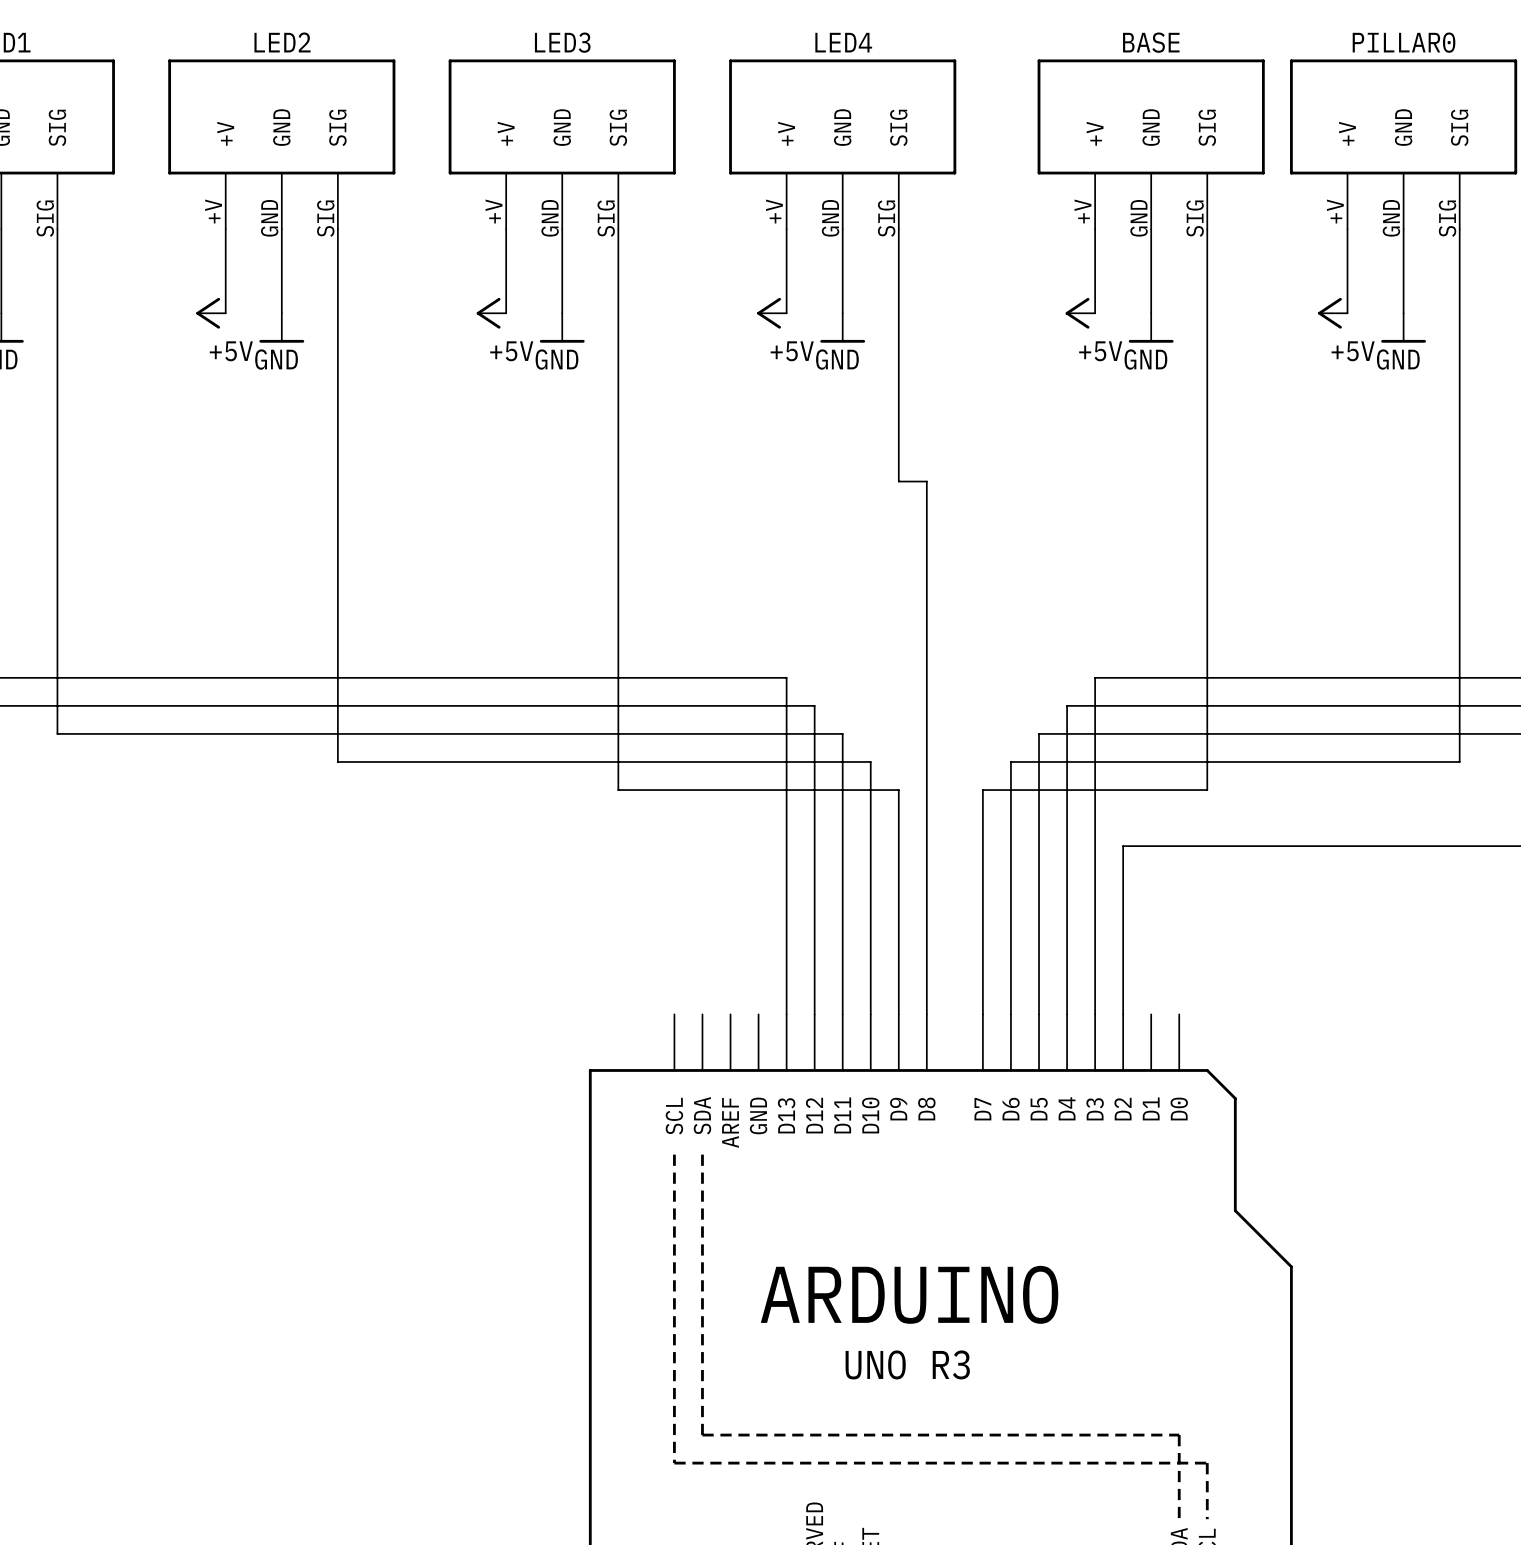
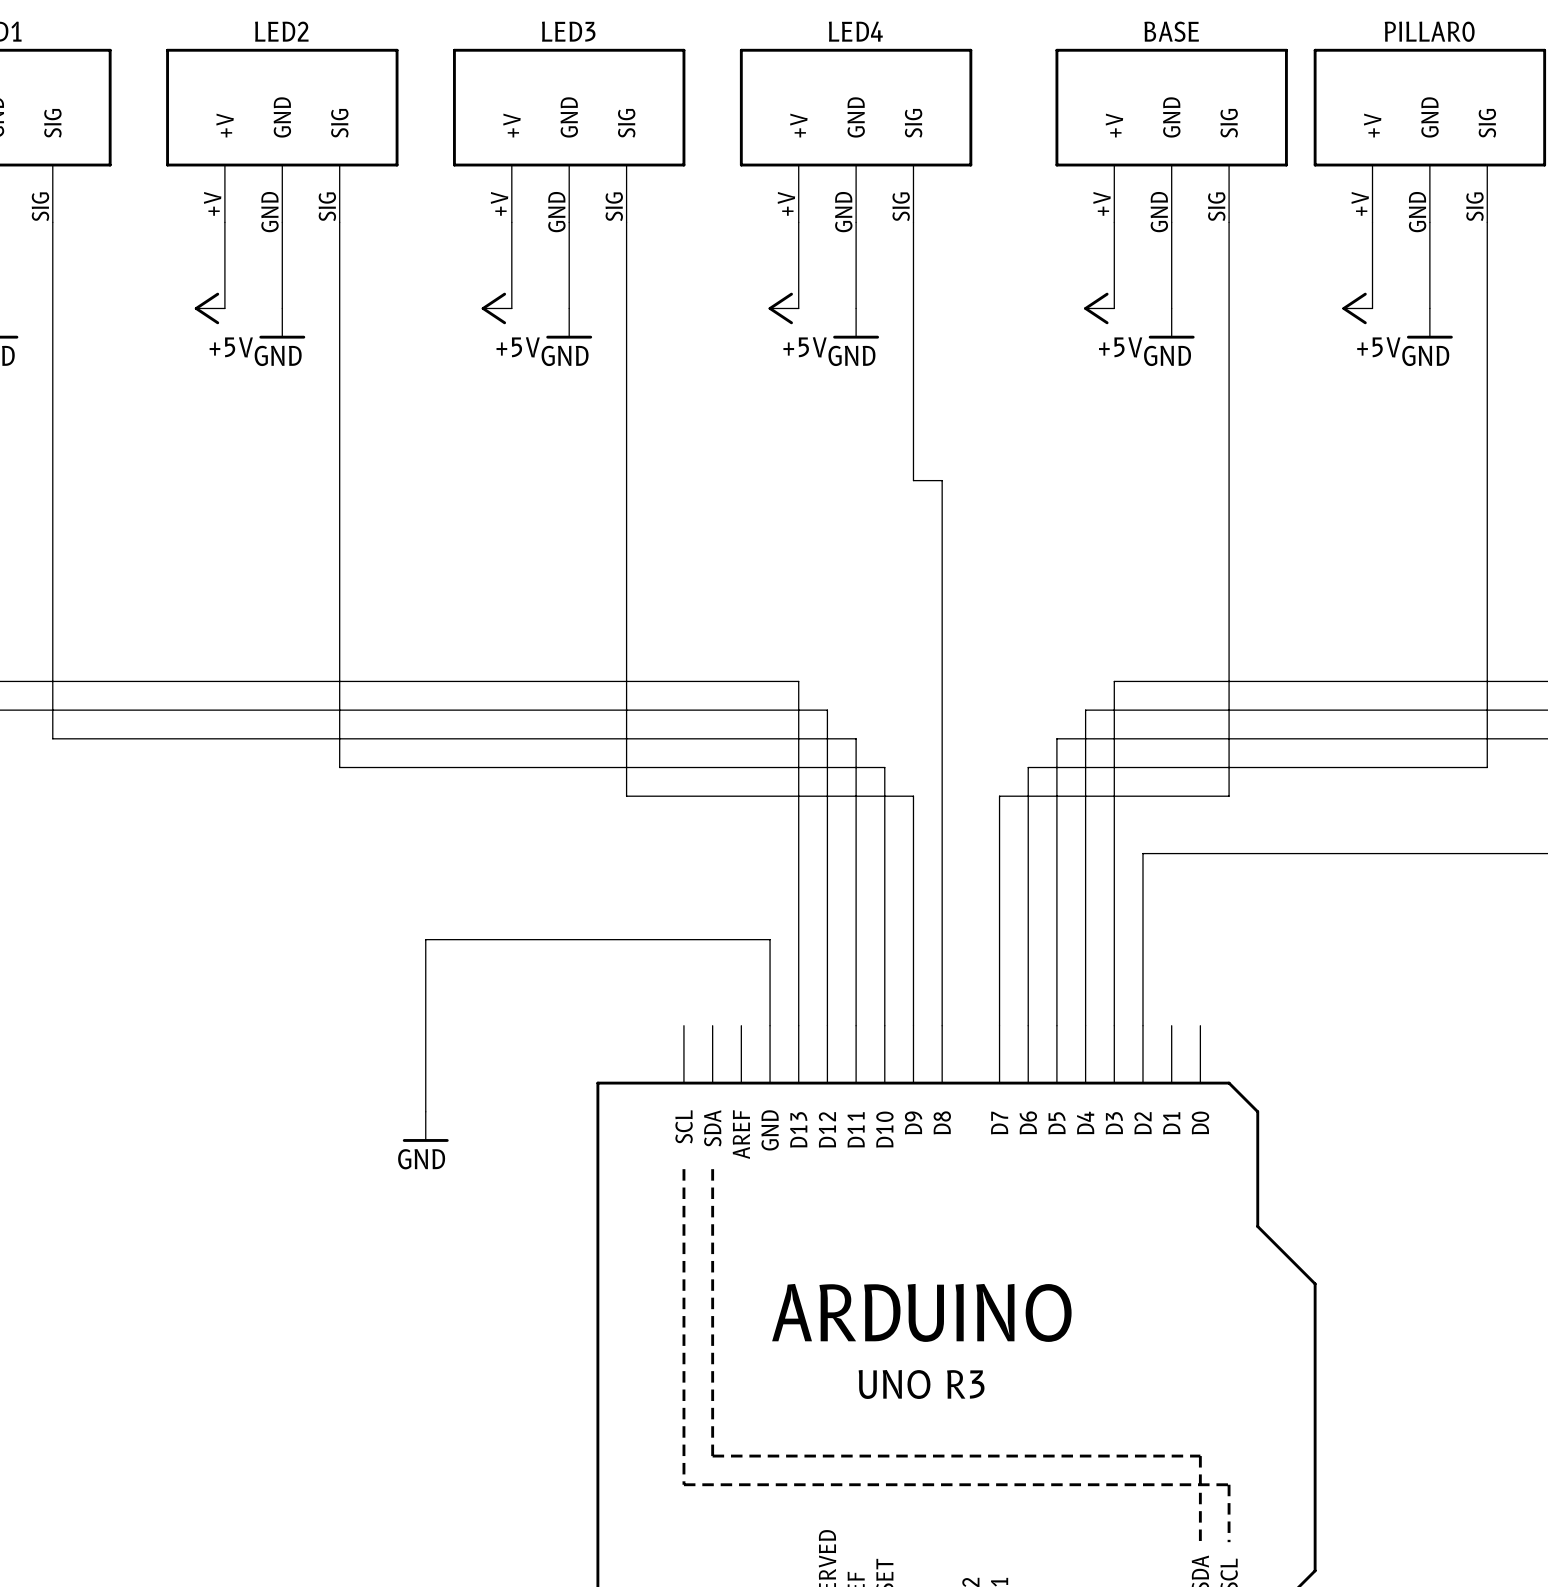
wire: none -> (770, 1025) (770, 939) (425, 939) (425, 1111)
power symbol: none -> GND (425, 1126)

